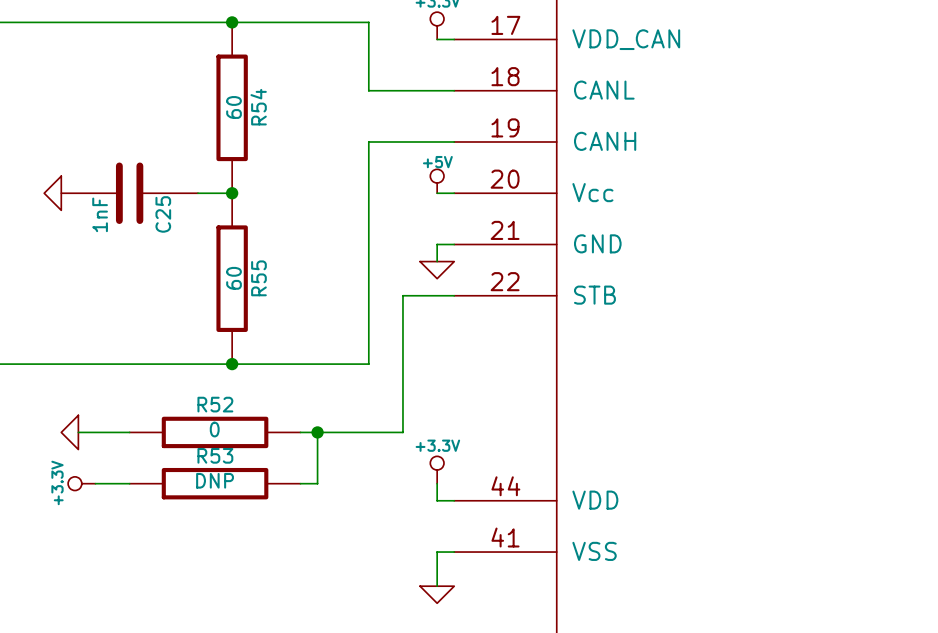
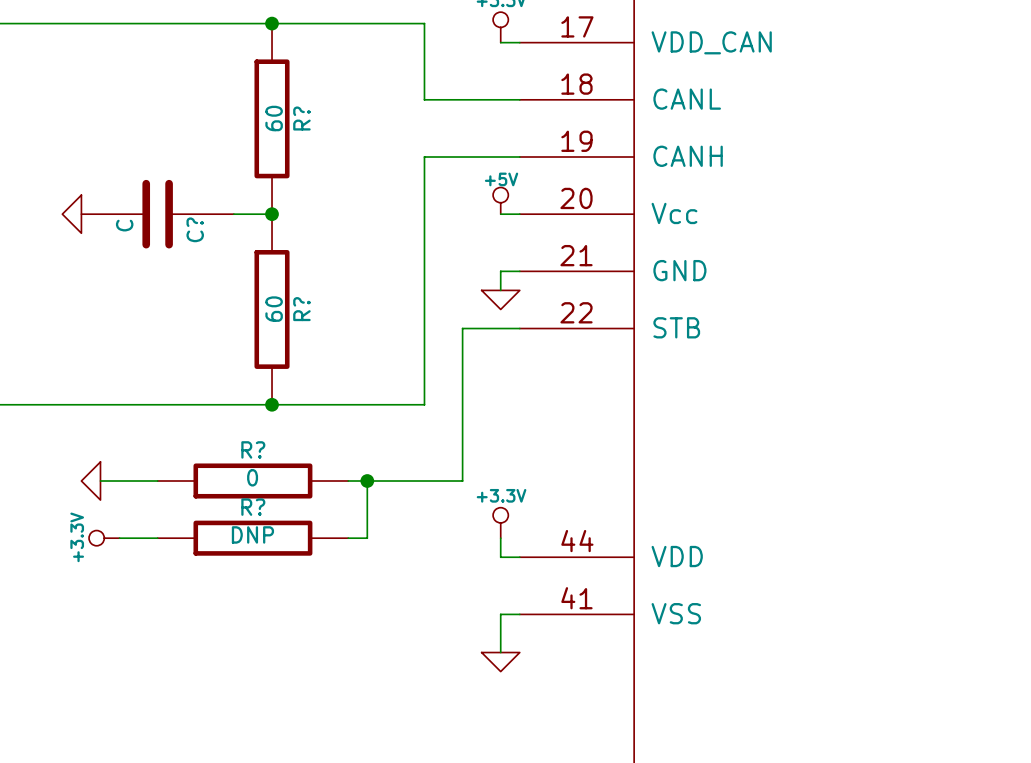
R54 name: R54 (258, 107) -> R? (301, 118)
C25 value: 1nF (100, 214) -> C (124, 225)
C25 name: C25 (163, 214) -> C? (195, 229)
R55 name: R55 (258, 278) -> R? (301, 309)
R52 name: R52 (215, 404) -> R? (253, 449)
R53 name: R53 (215, 455) -> R? (253, 507)

